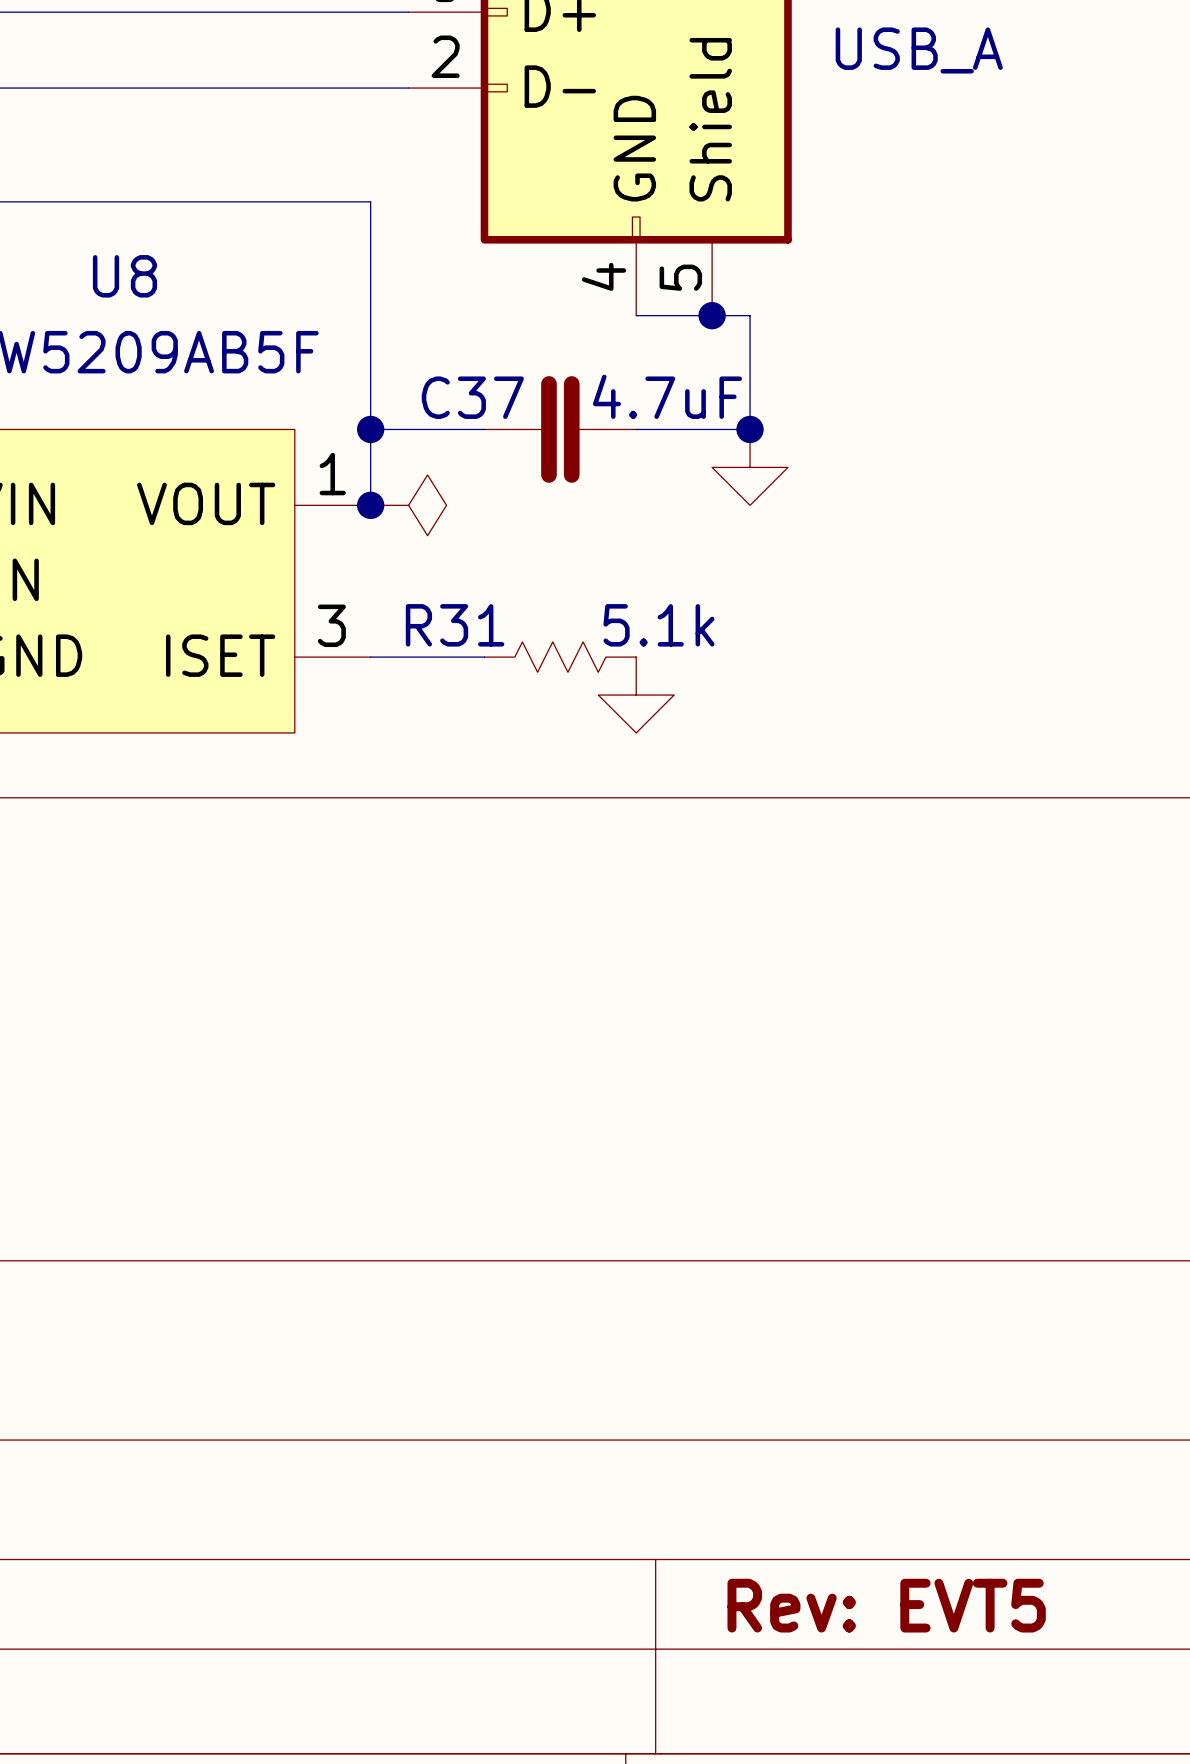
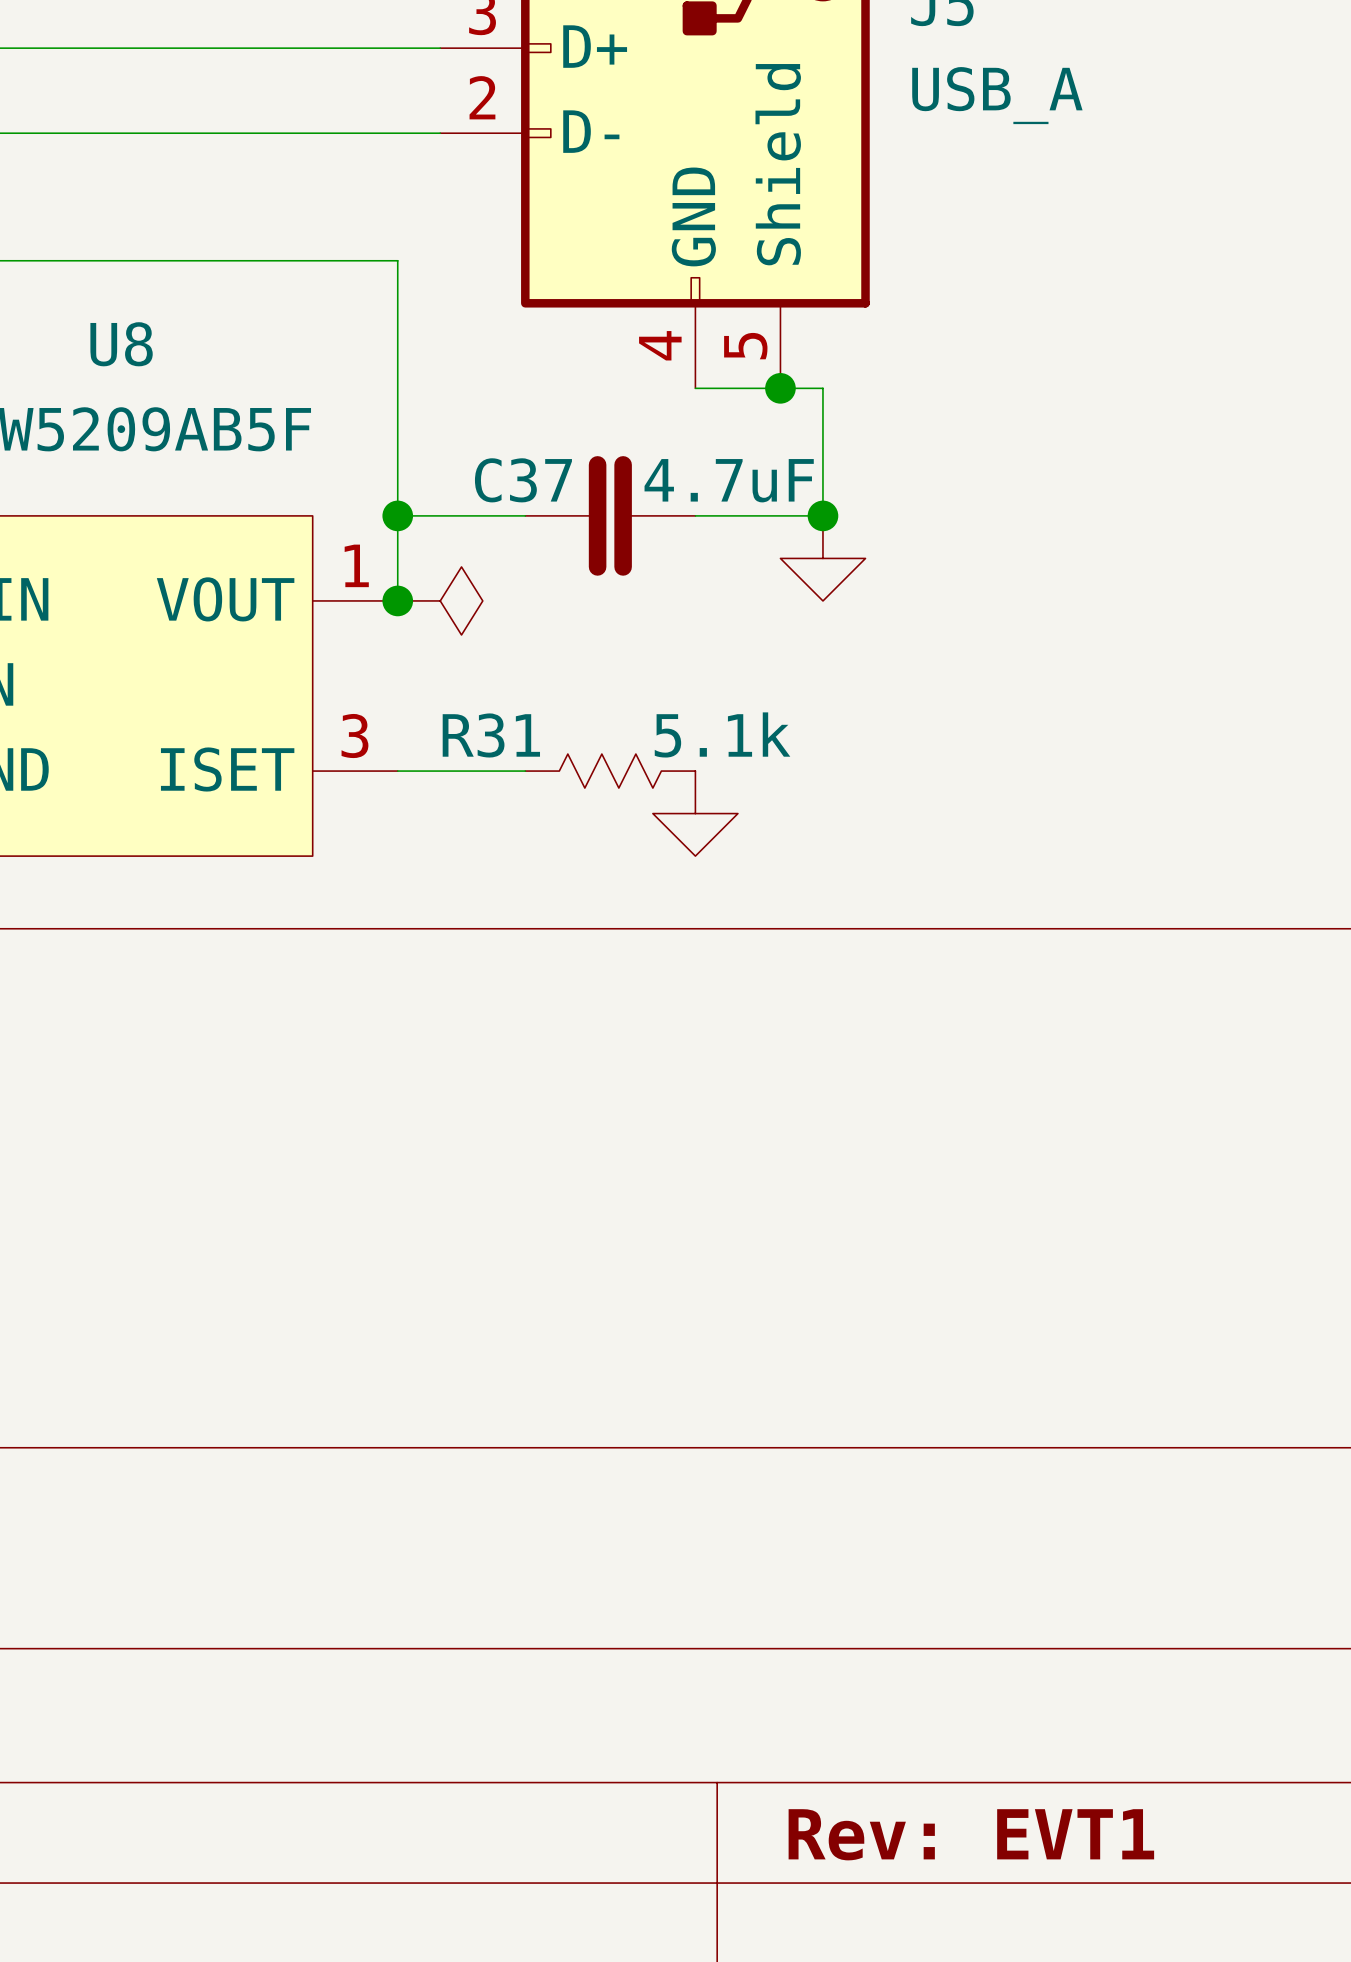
title block: Rev: EVT5 (886, 1605) -> Rev: EVT1 (971, 1834)

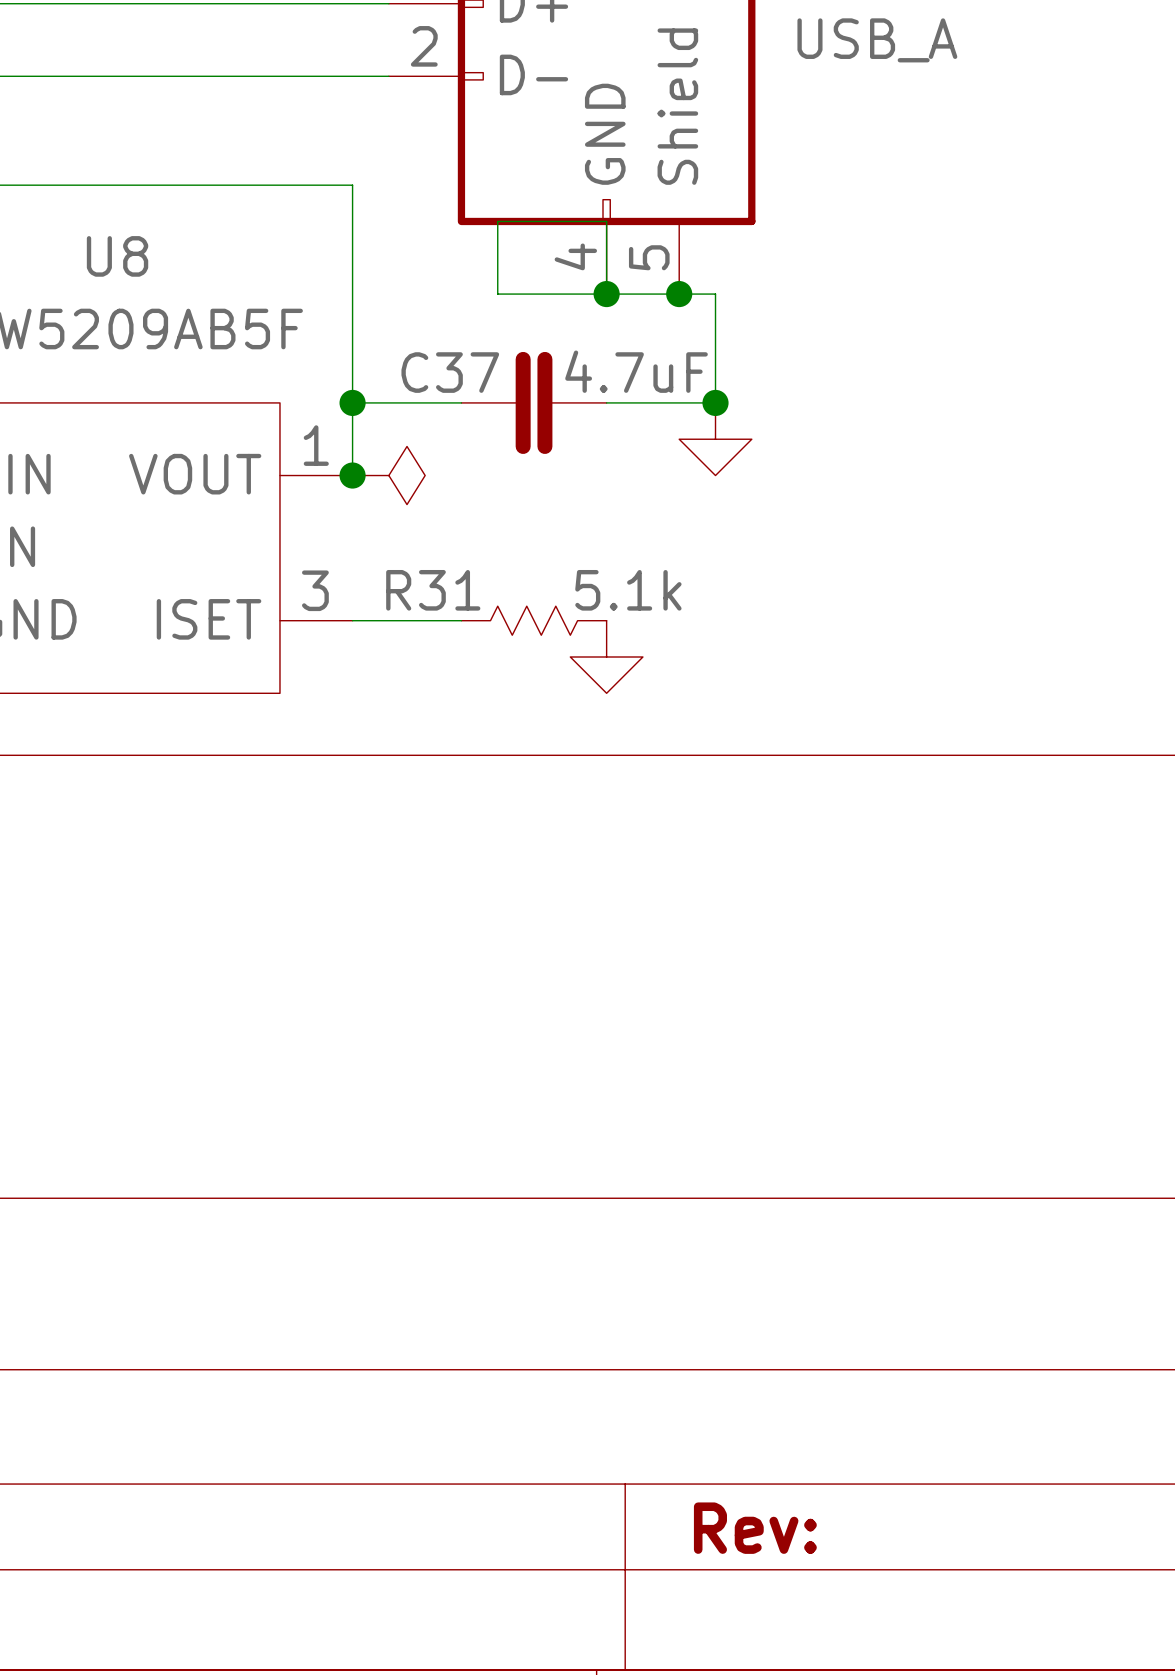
wire: none -> (497, 221) (606, 221) (606, 294) (497, 294) (497, 221)
junction: none -> (606, 294)
title block: Rev: EVT1 (971, 1834) -> Rev: (755, 1528)

